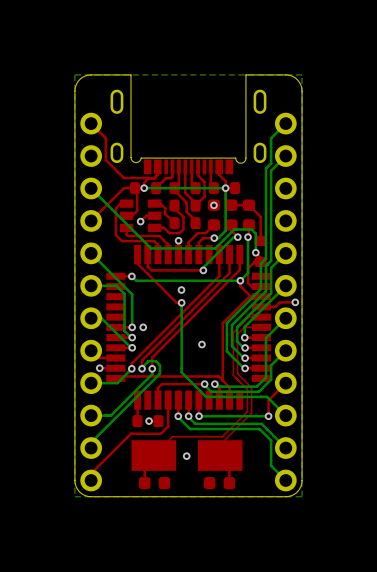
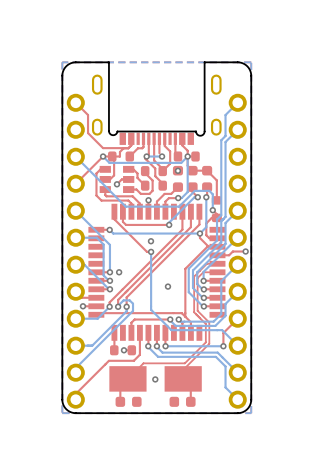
via: none -> (103, 156)
via: (144, 188) -> none
bottom track: (176, 188) (144, 188) -> none
via: none -> (146, 156)
part: (185, 188) -> none
via: none -> (162, 156)
bottom track: (225, 188) (194, 188) -> (187, 156) (181, 162) (109, 162) (103, 156)

